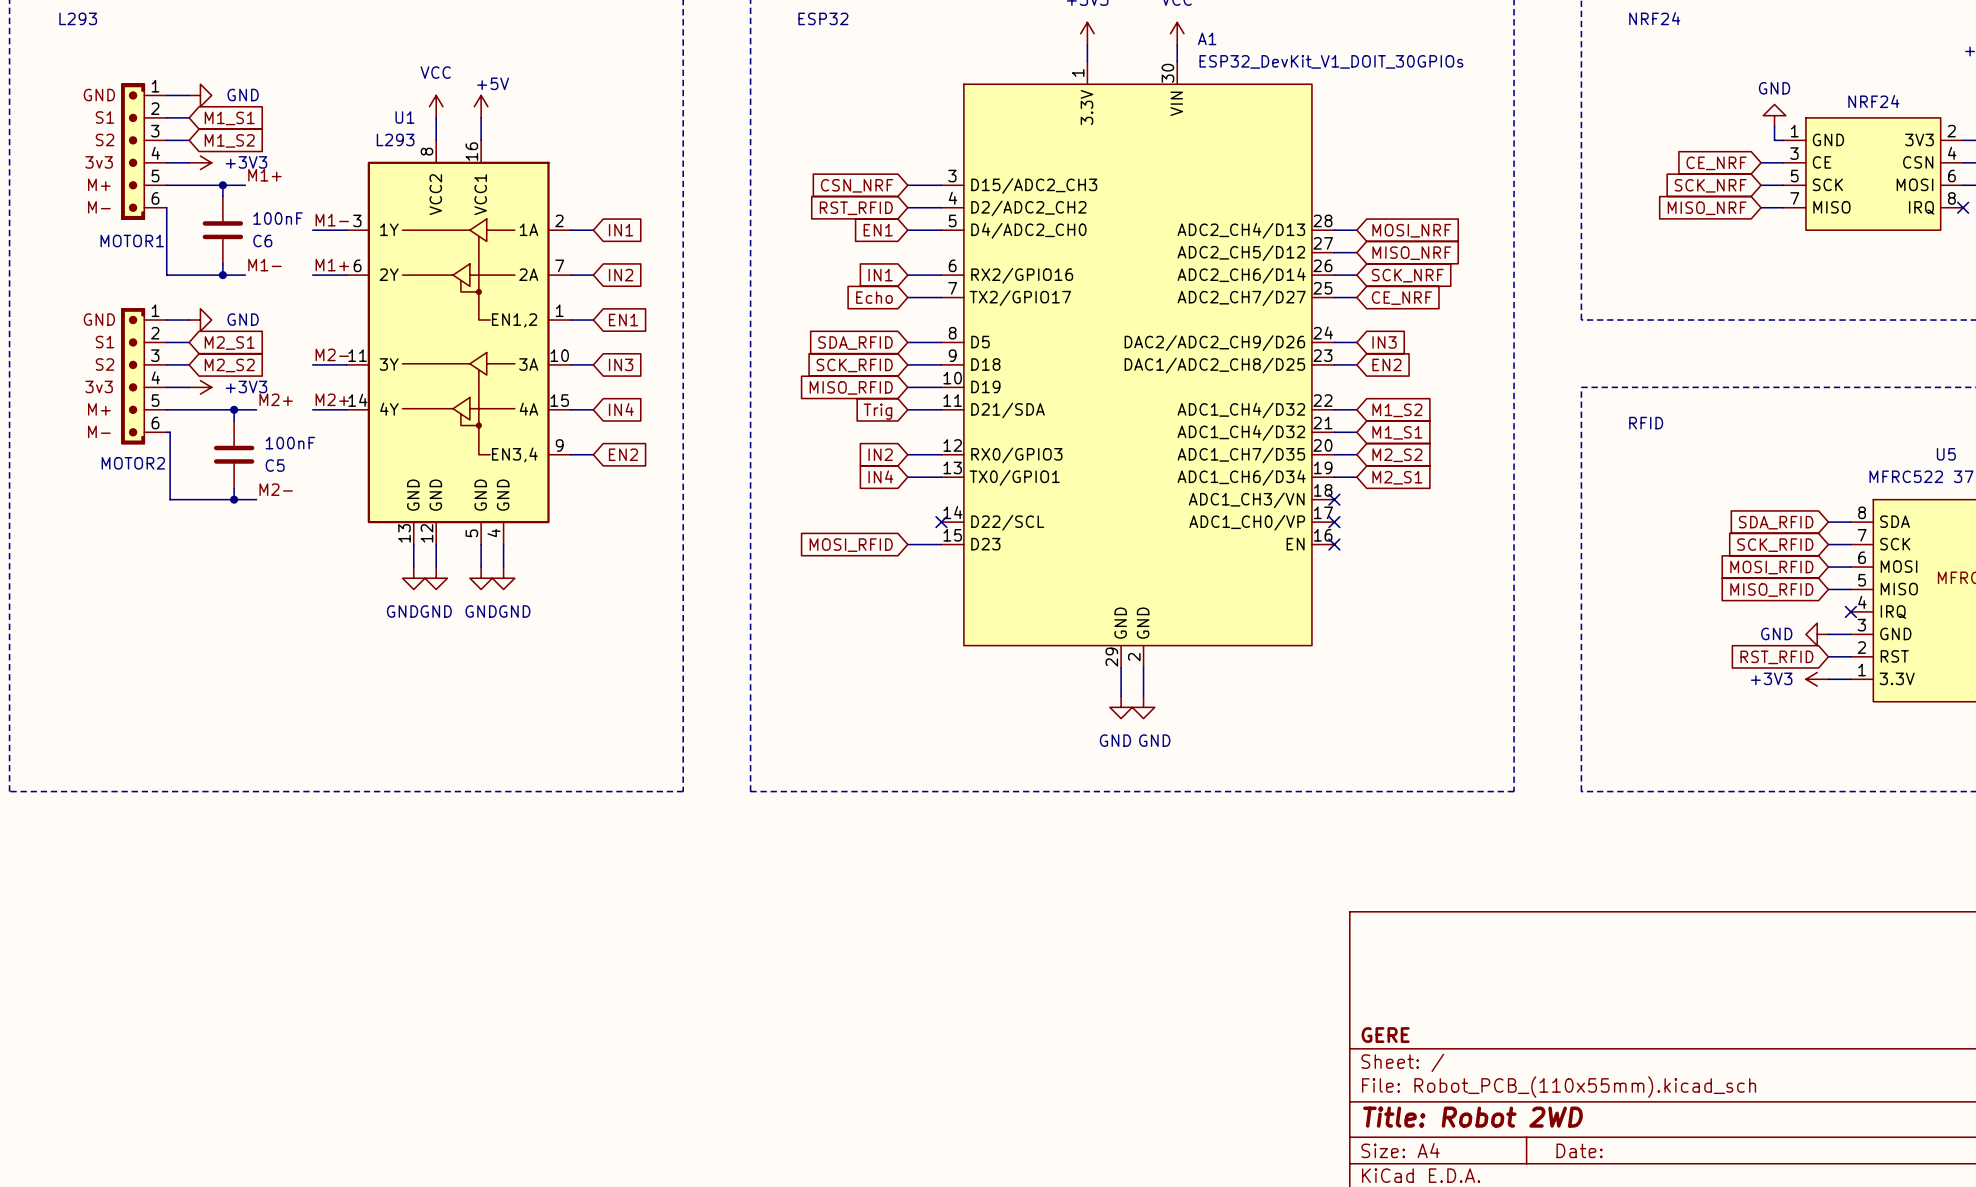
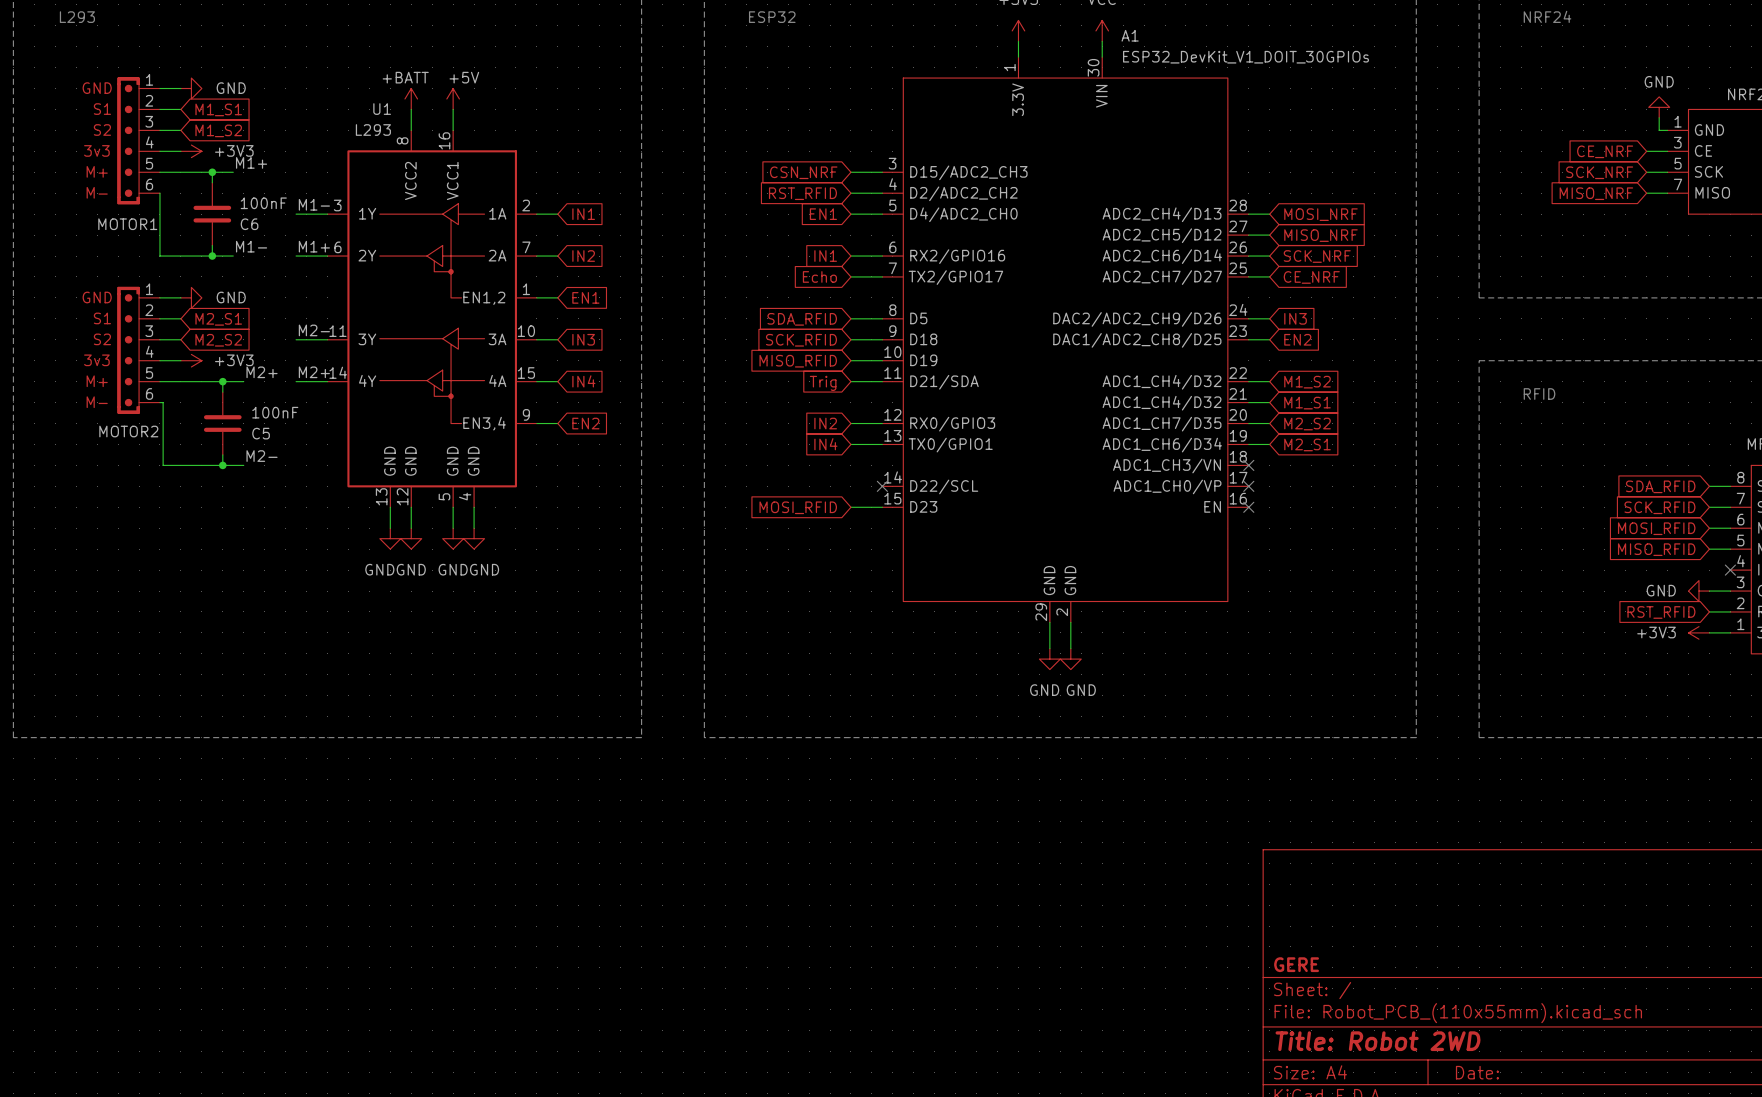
power symbol: VCC (436, 106) -> +BATT (411, 98)

